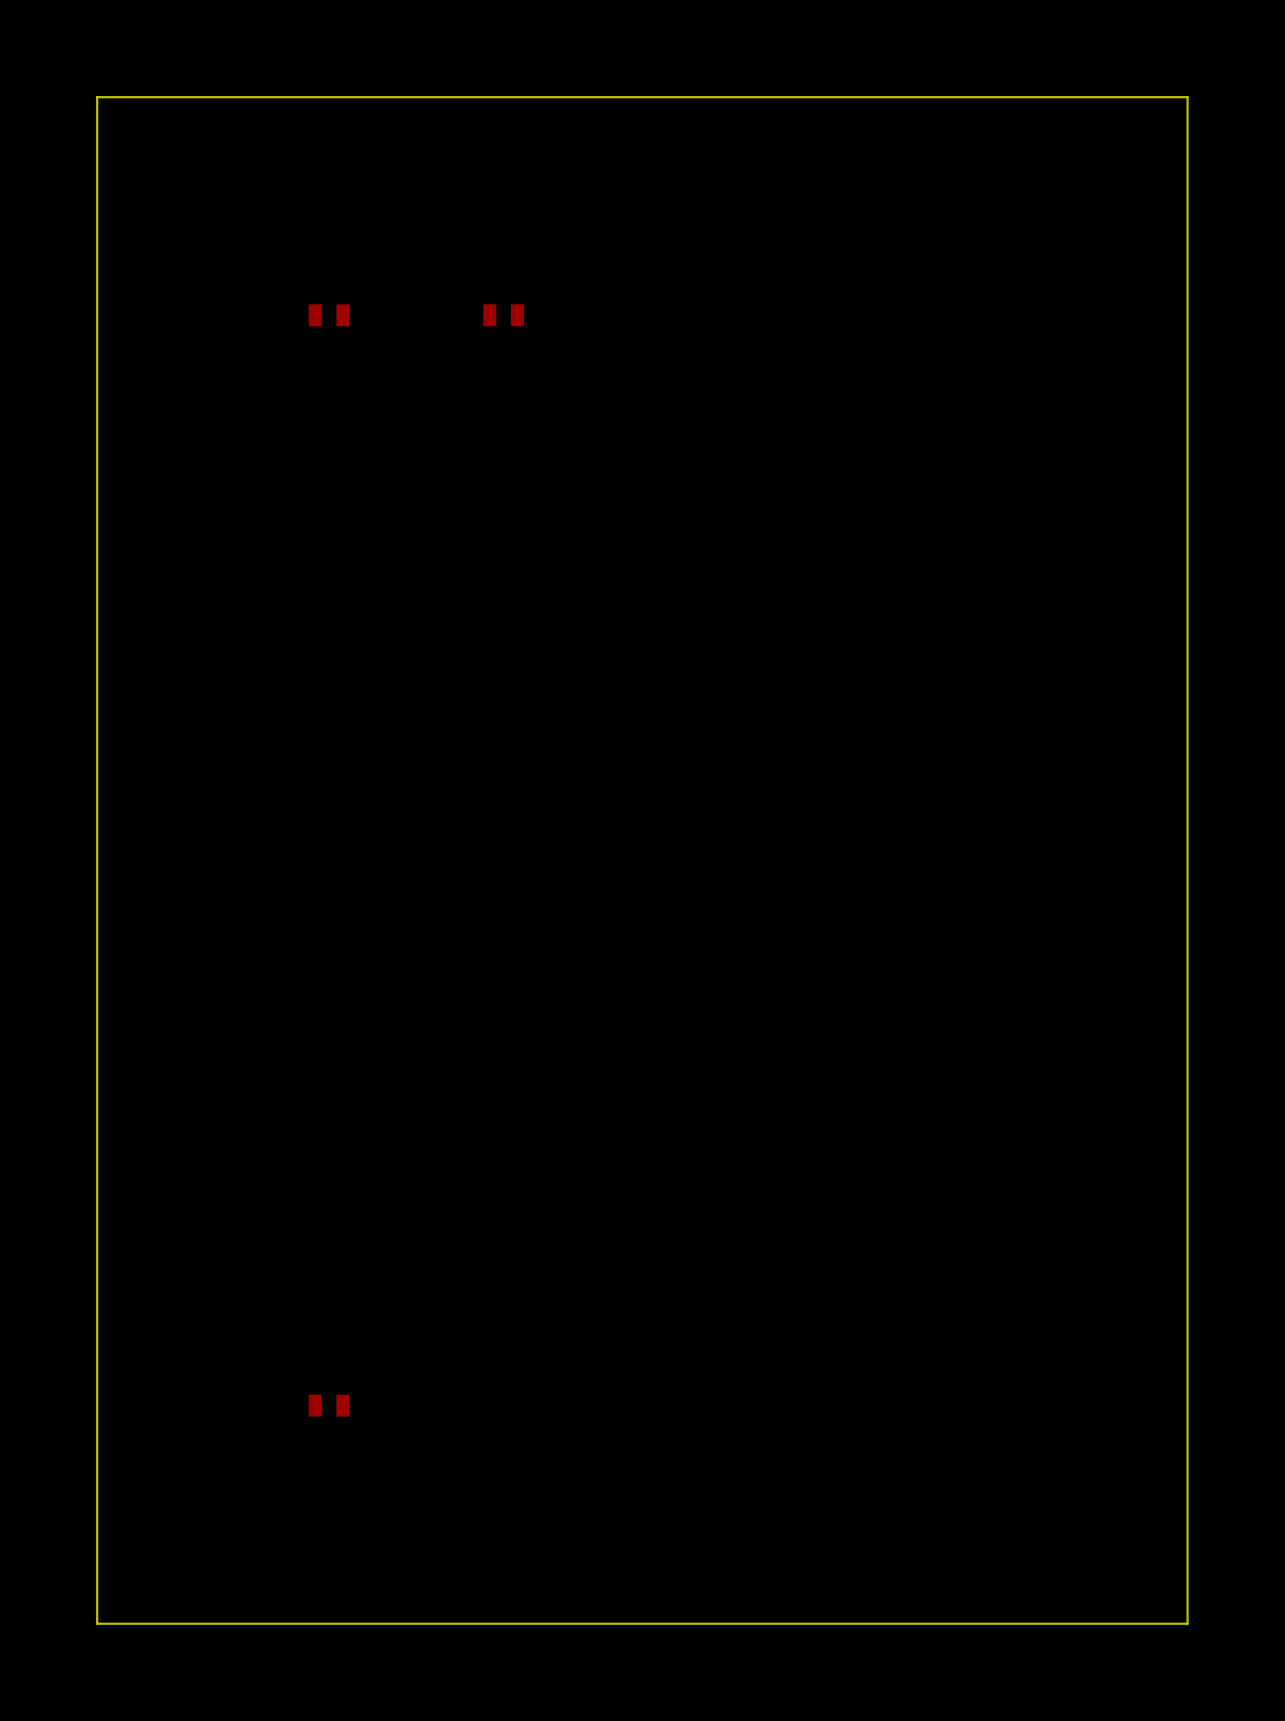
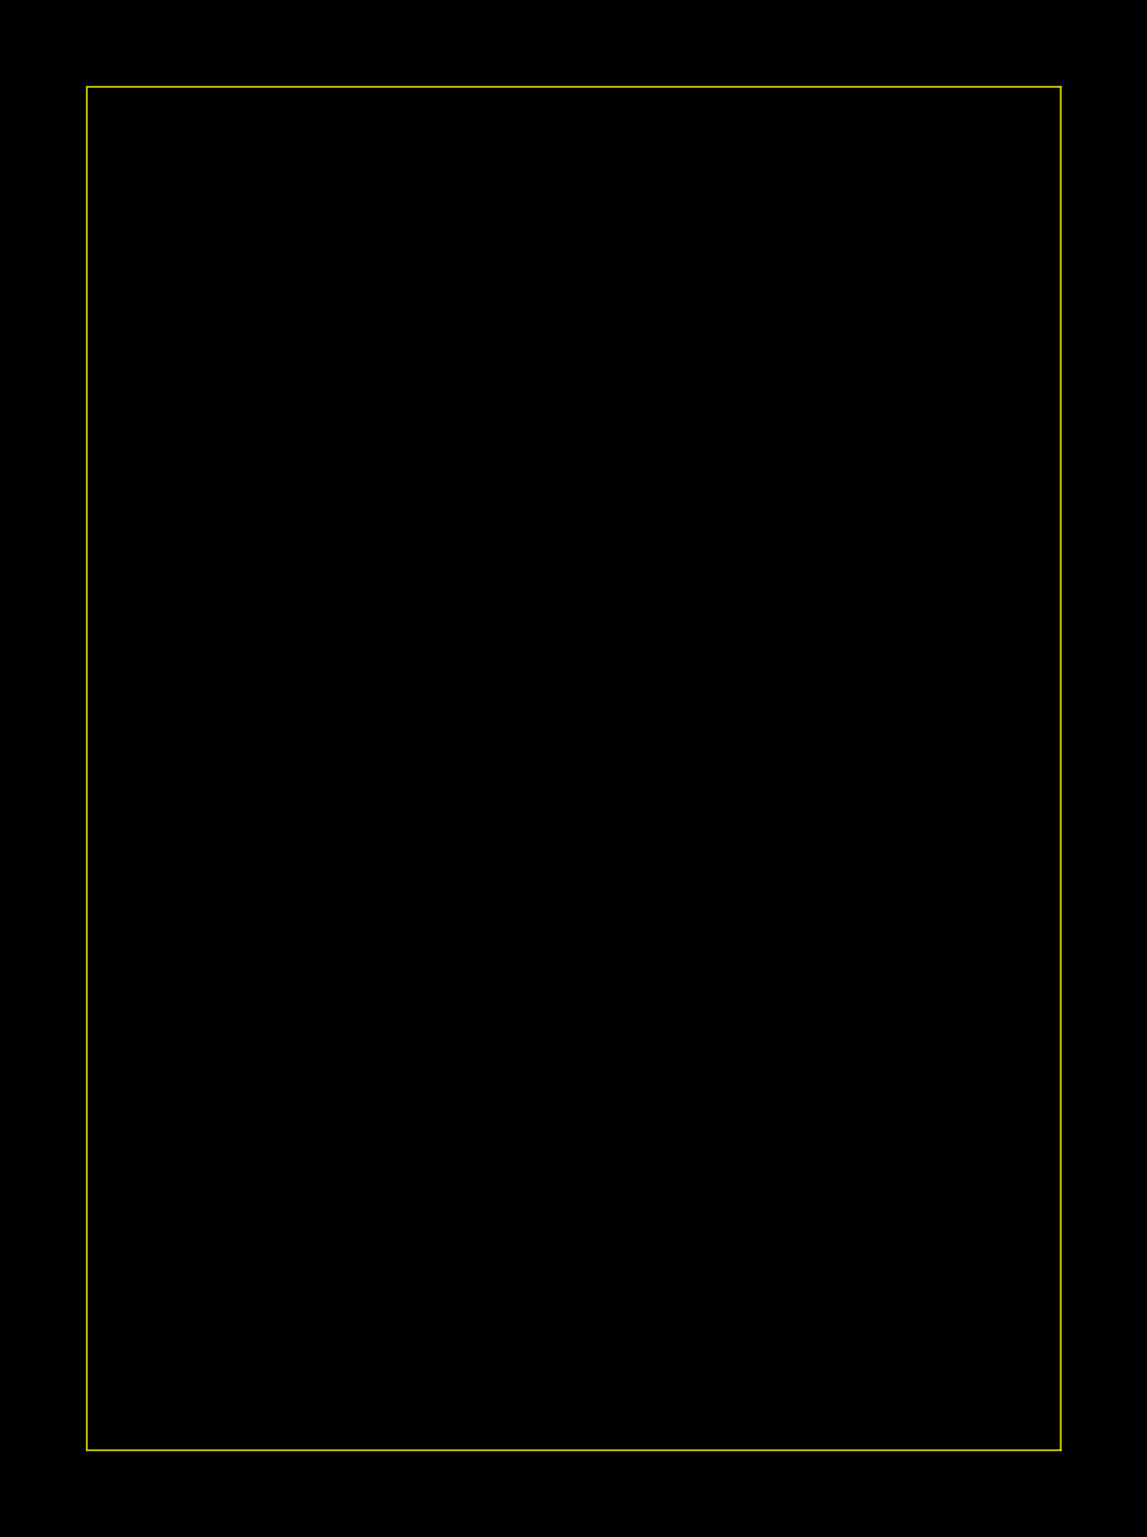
part: (329, 315) -> none
part: (503, 315) -> none
part: (329, 1405) -> none

